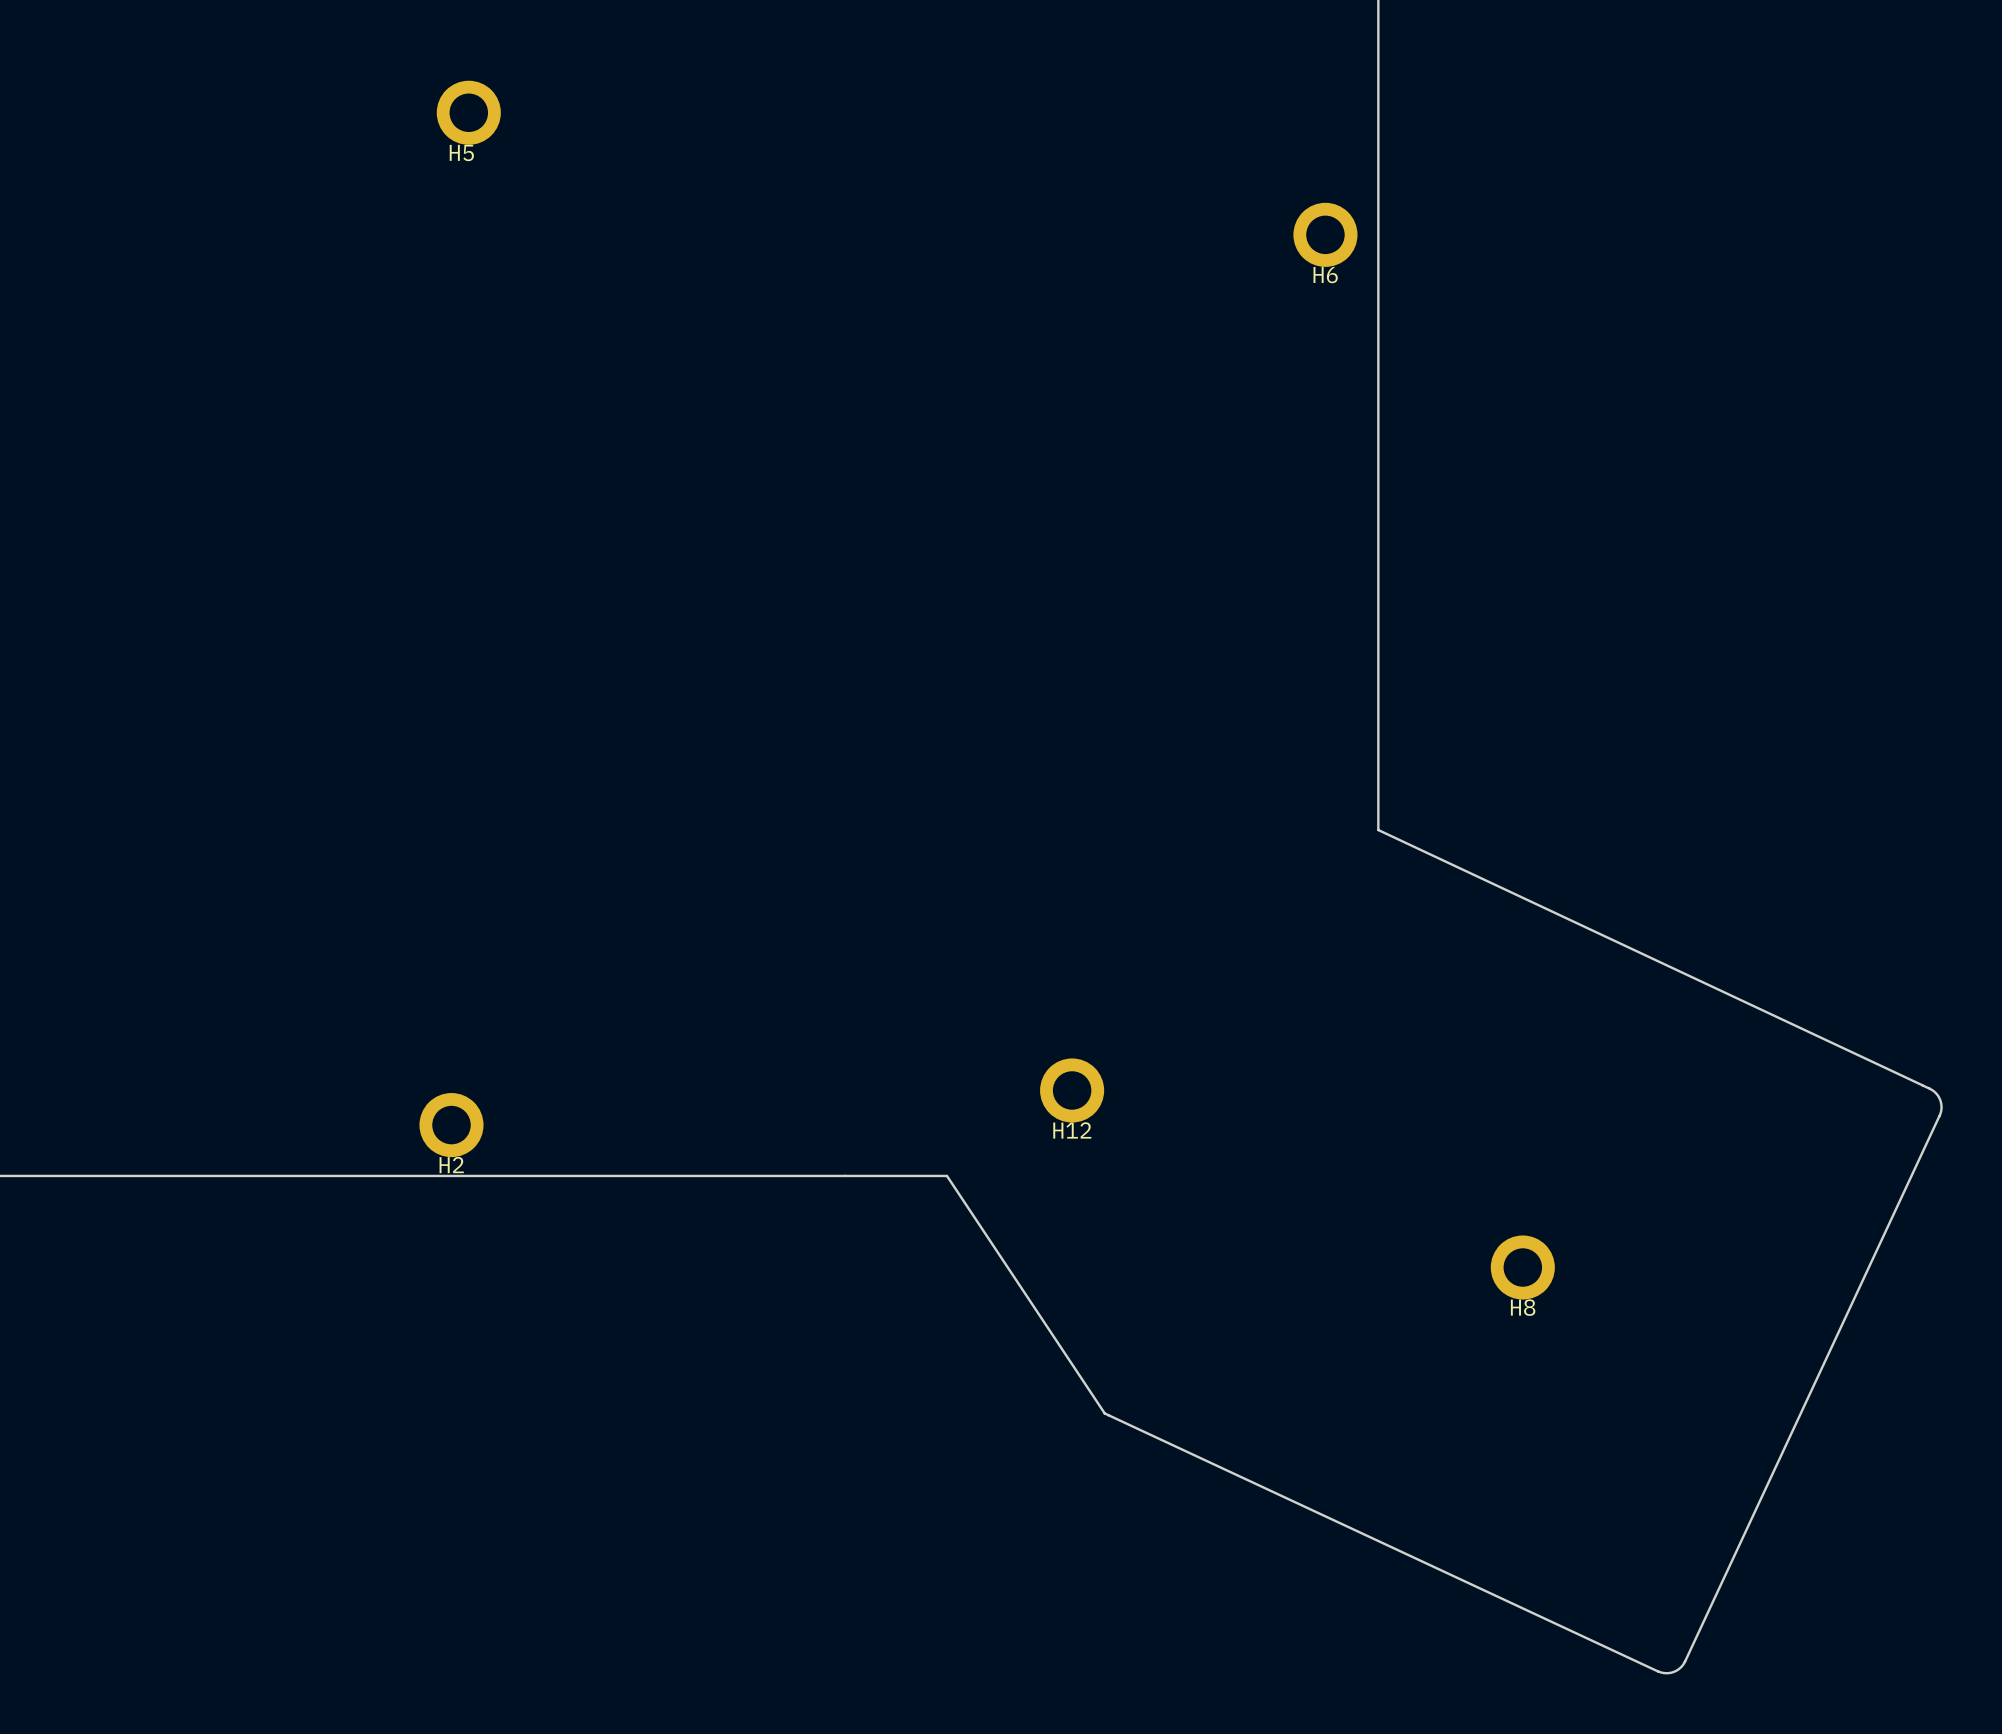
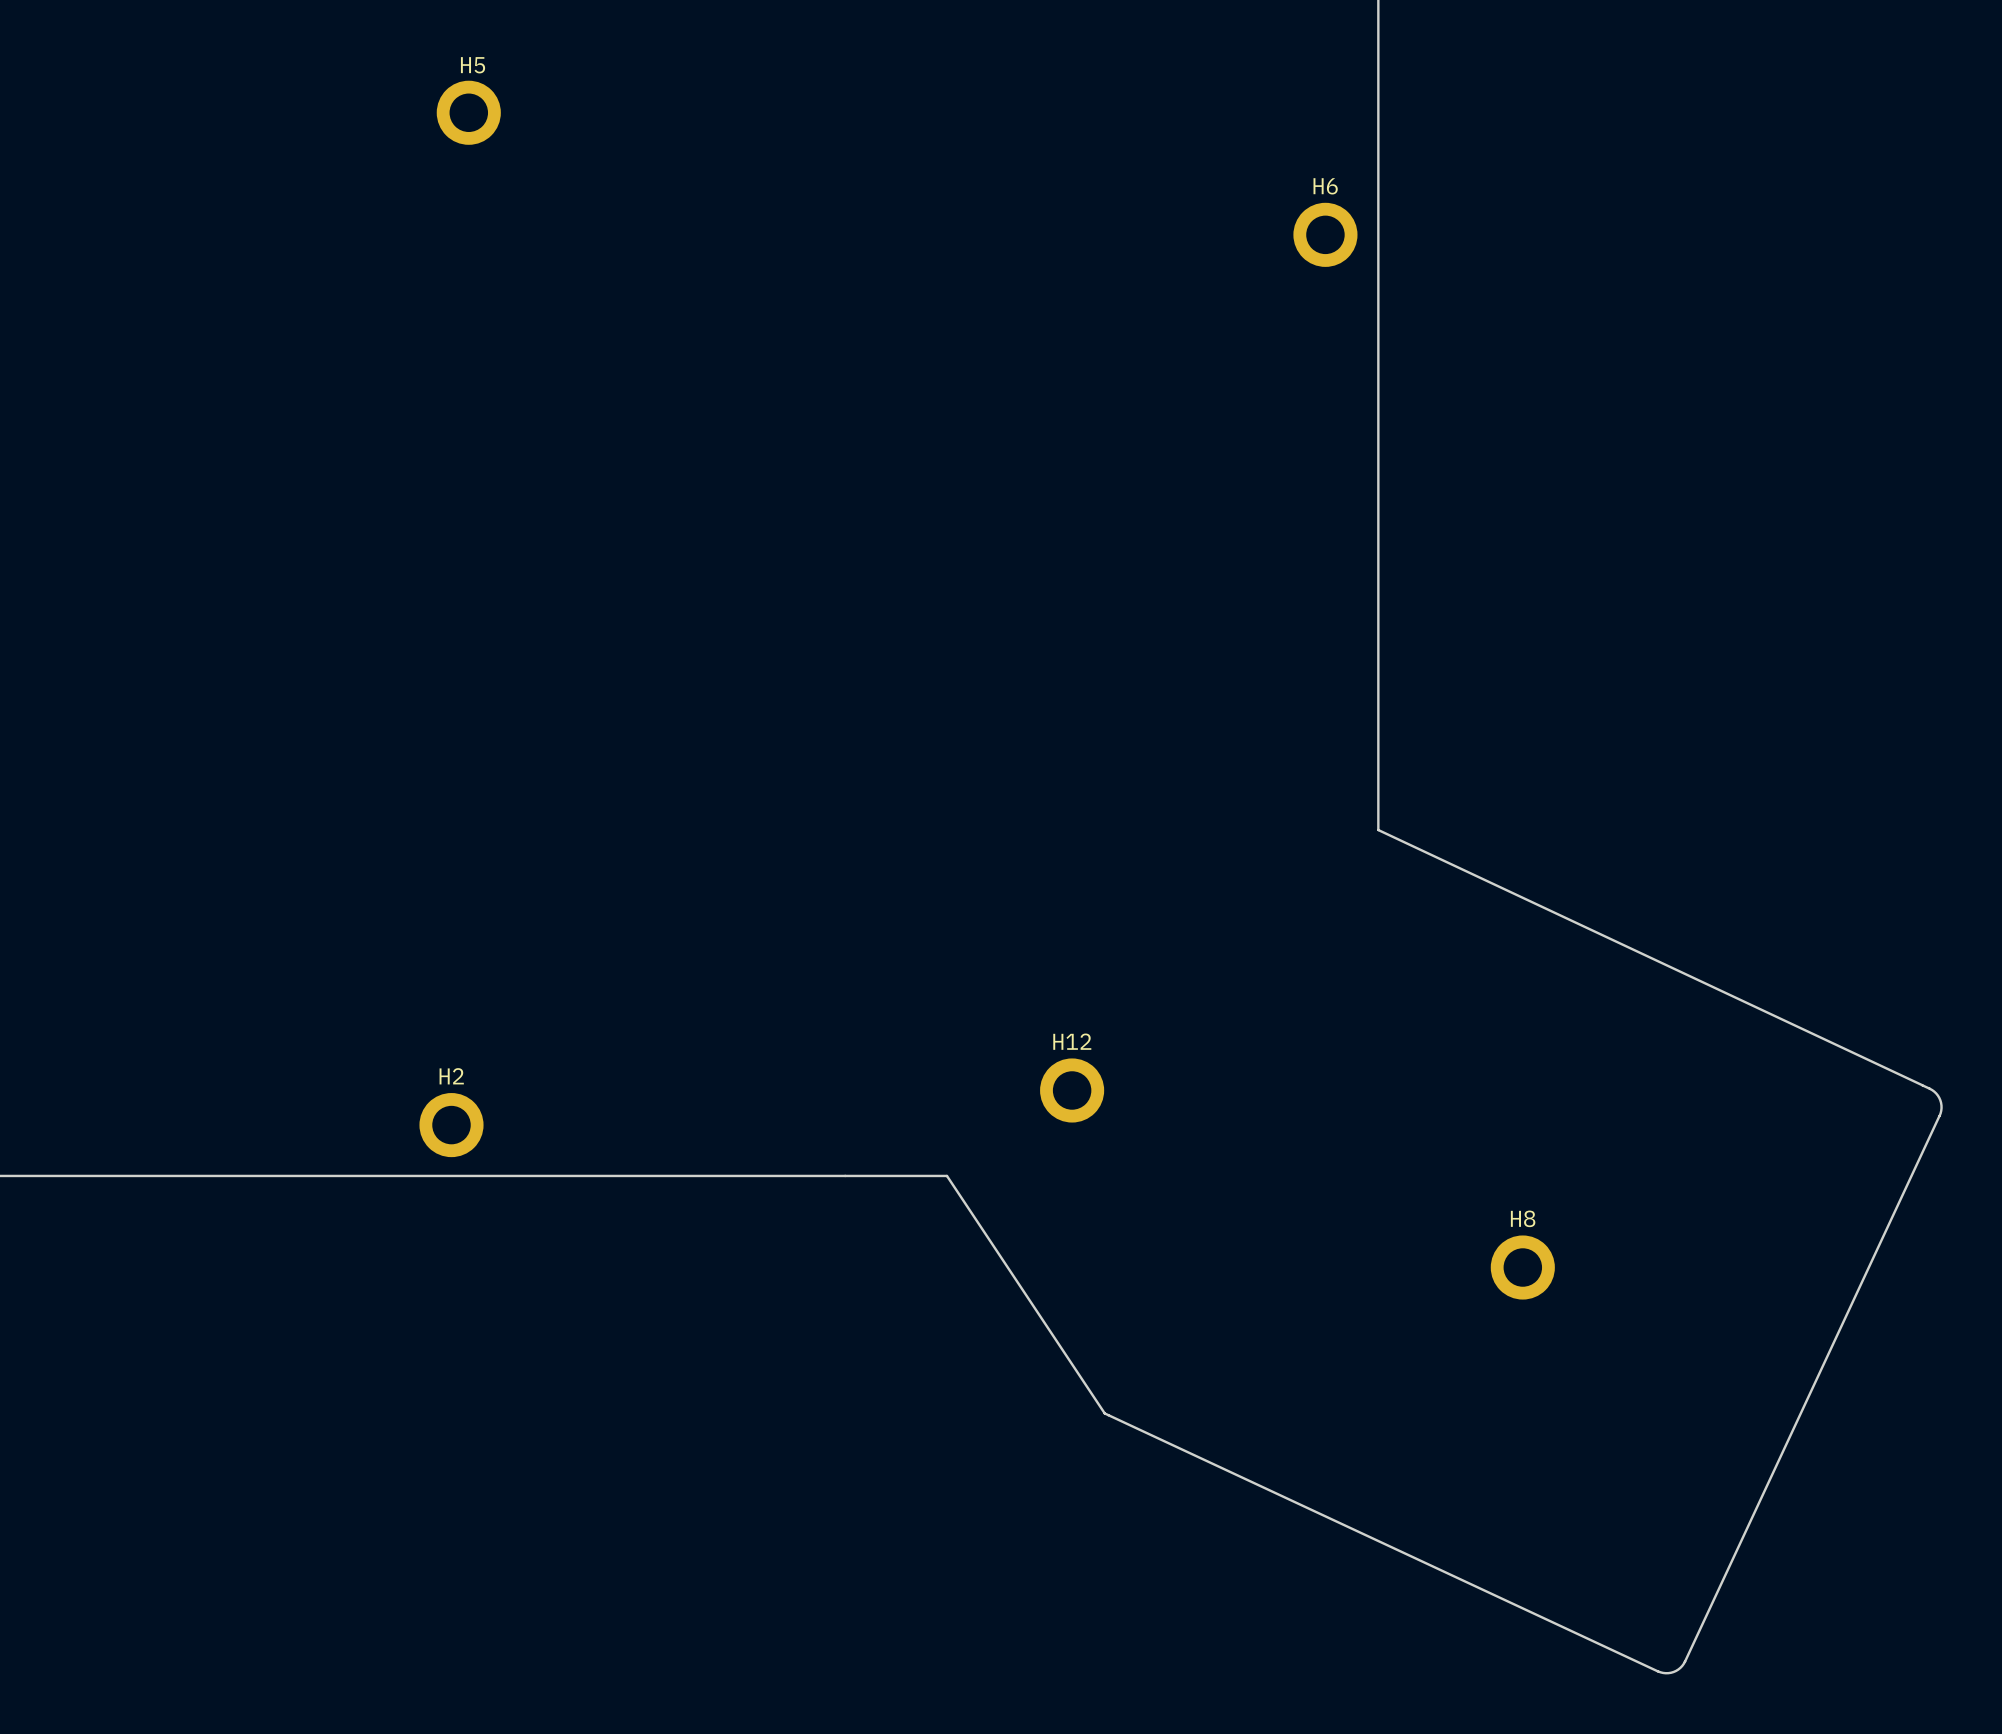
H5 name position: H5 (461, 153) -> H5 (473, 65)
H6 name position: H6 (1325, 275) -> H6 (1325, 186)
H12 name position: H12 (1072, 1130) -> H12 (1072, 1041)
H2 name position: H2 (451, 1165) -> H2 (451, 1076)
H8 name position: H8 (1523, 1307) -> H8 (1523, 1218)

